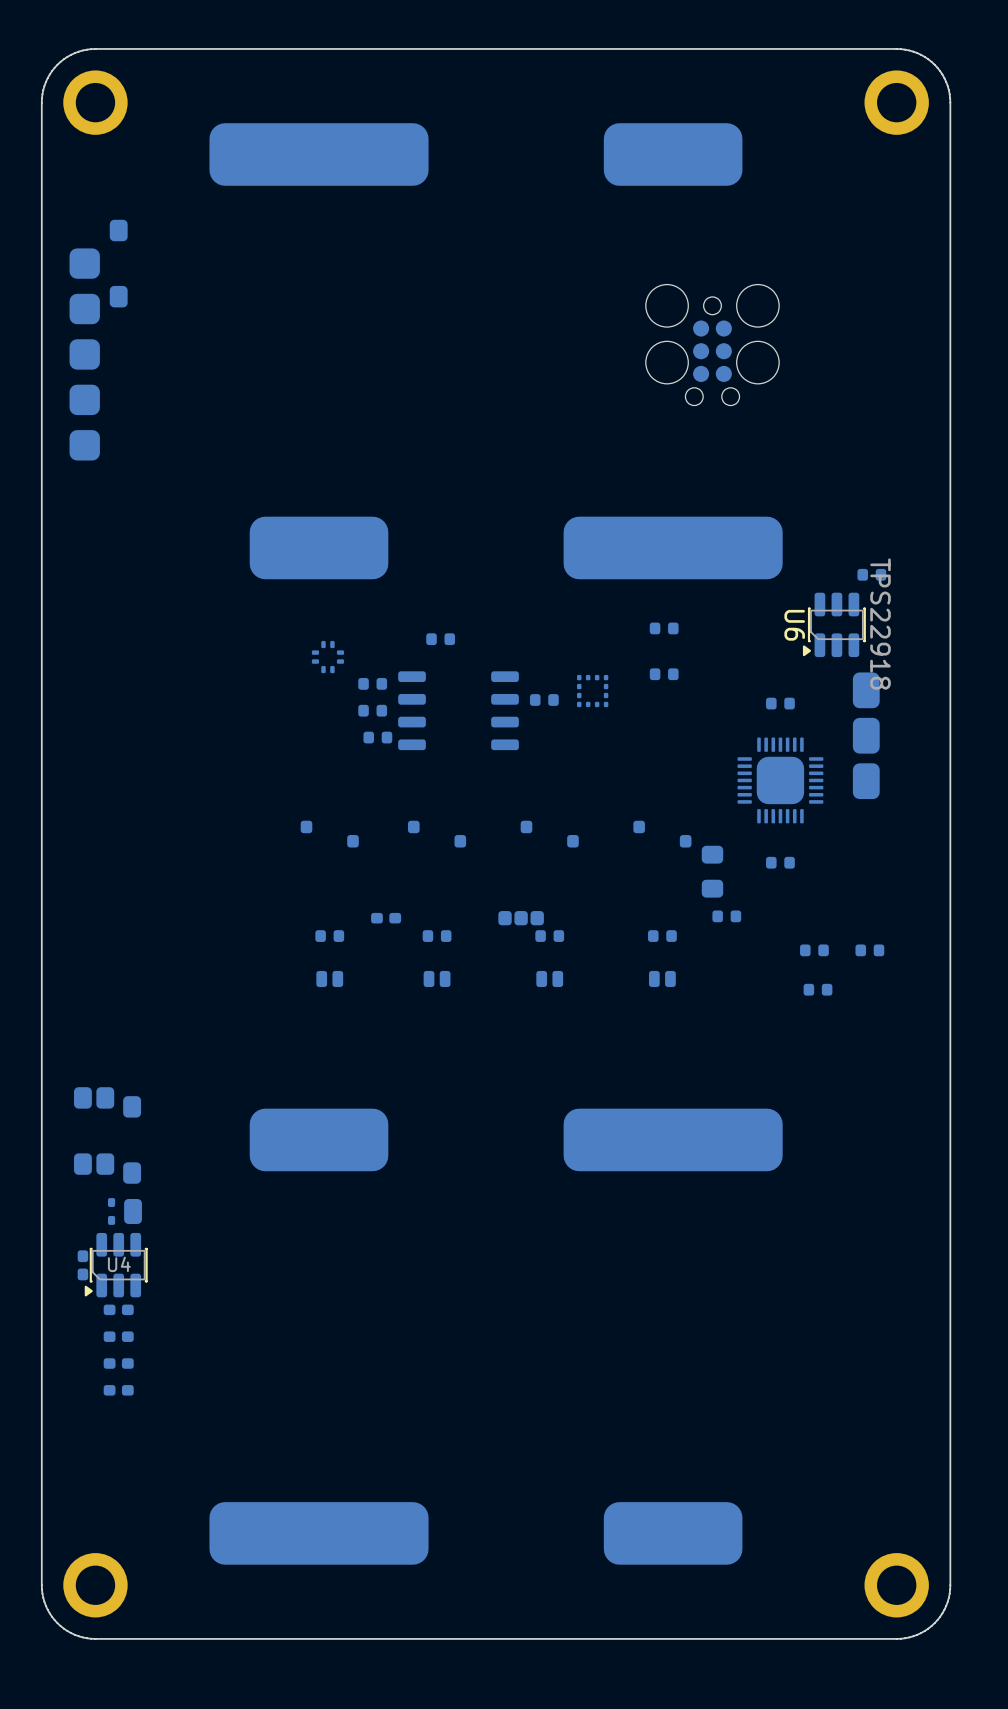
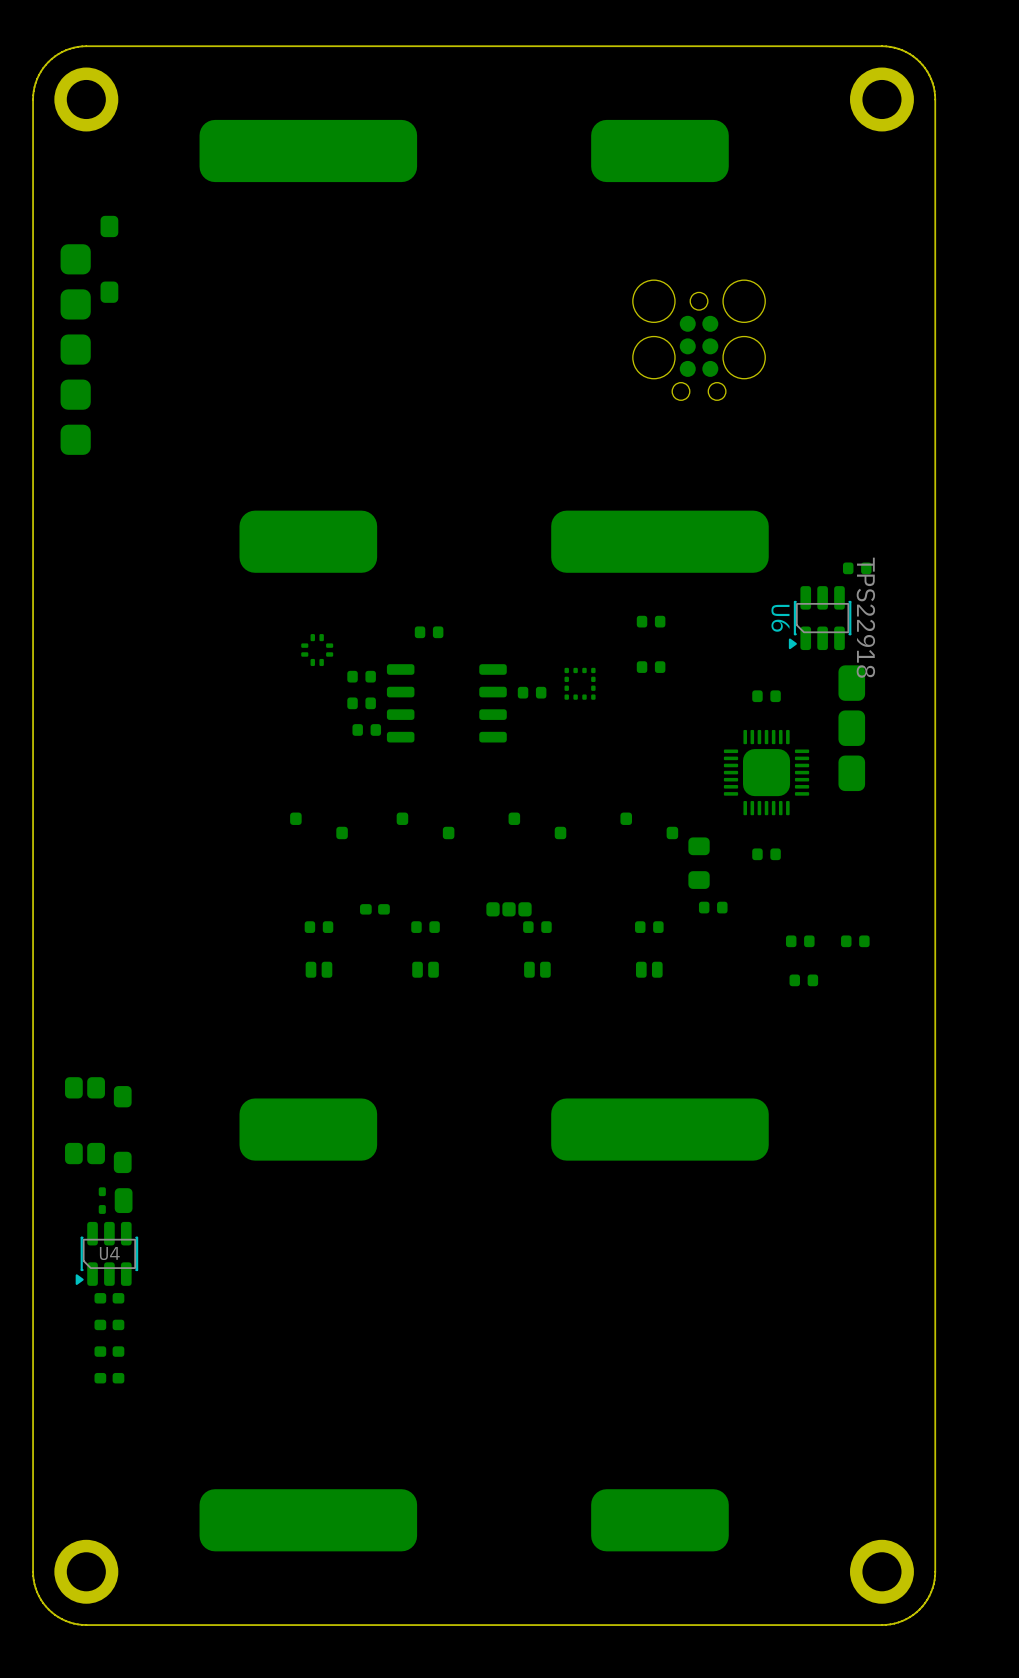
part: (82, 1265) -> none

